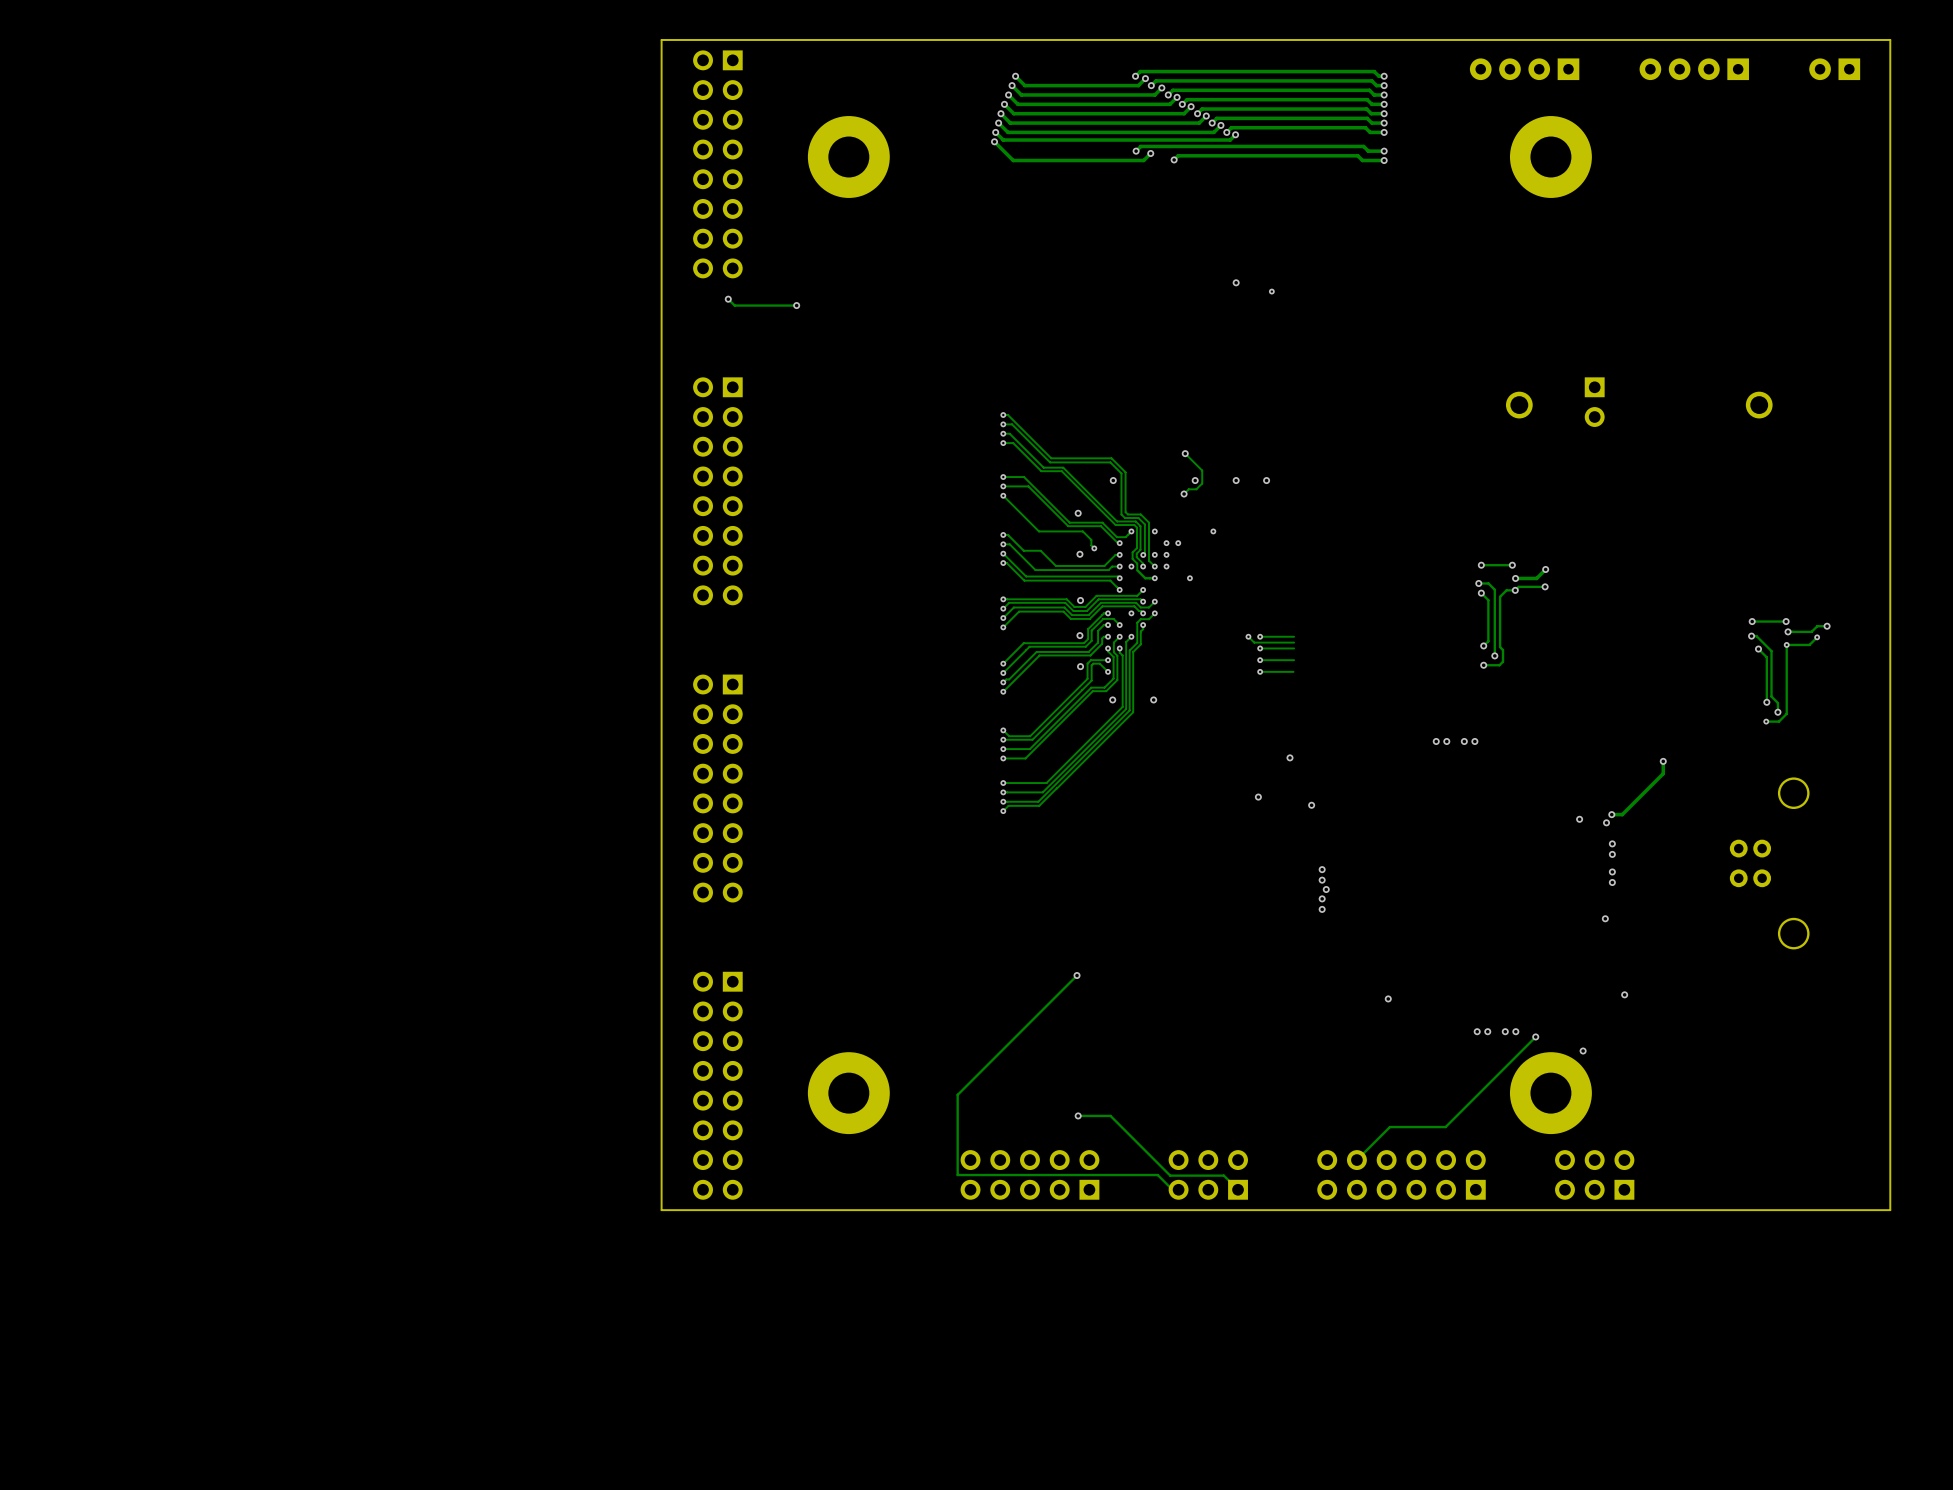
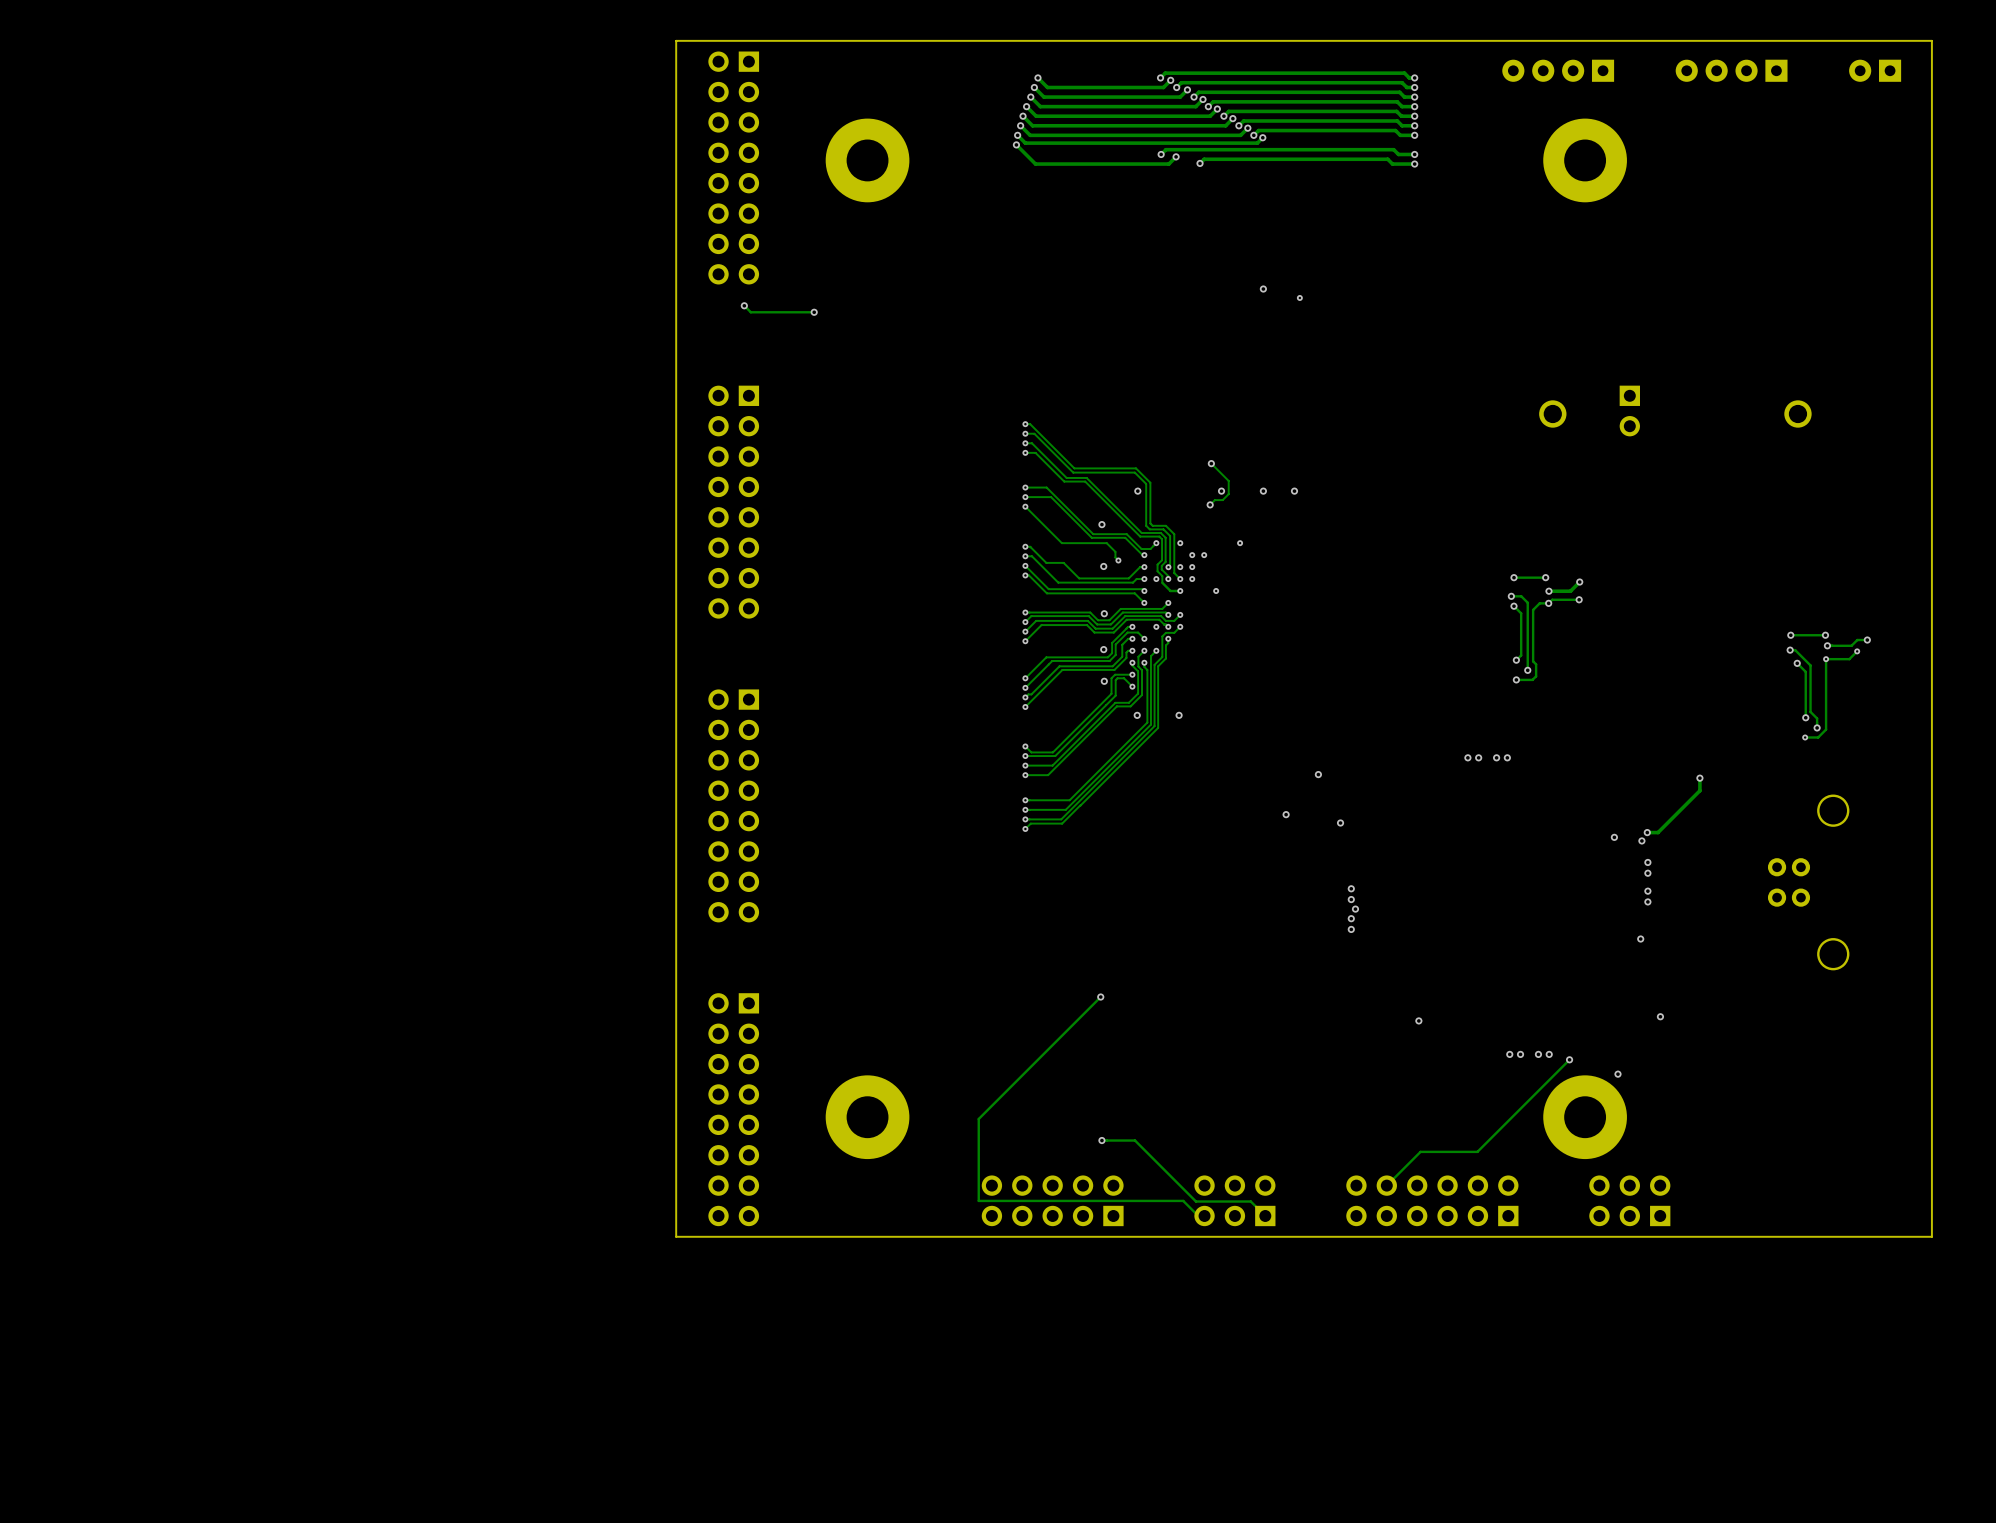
track: (1248, 636) (1254, 642) (1294, 642) -> none
via: (1248, 636) -> none
via: (1260, 636) -> none
track: (1294, 636) (1260, 636) -> none
via: (1260, 648) -> none
track: (1294, 648) (1260, 648) -> none
via: (1260, 660) -> none
track: (1294, 660) (1260, 660) -> none
via: (1260, 671) -> none
track: (1293, 671) (1260, 671) -> none

